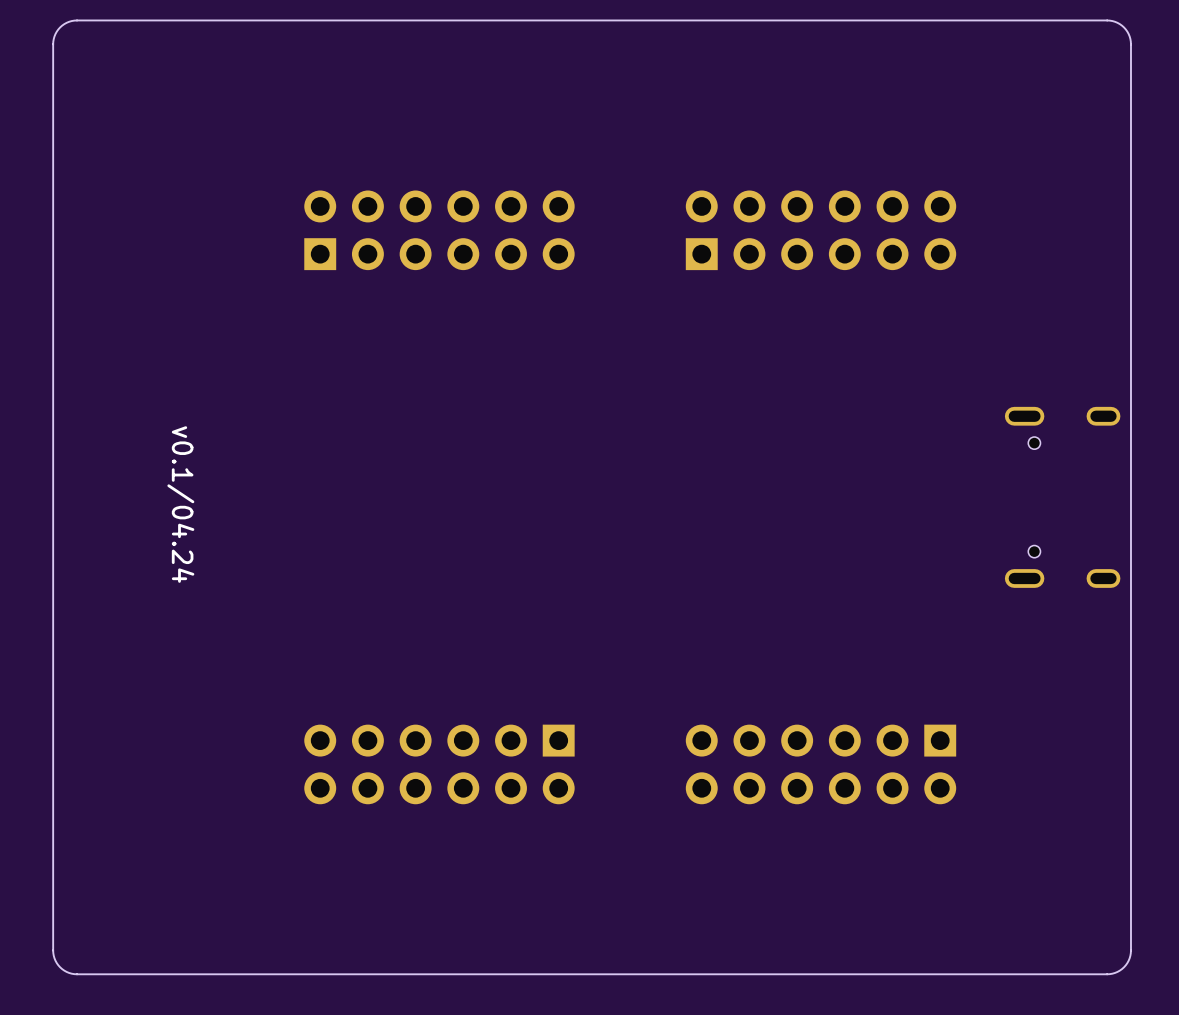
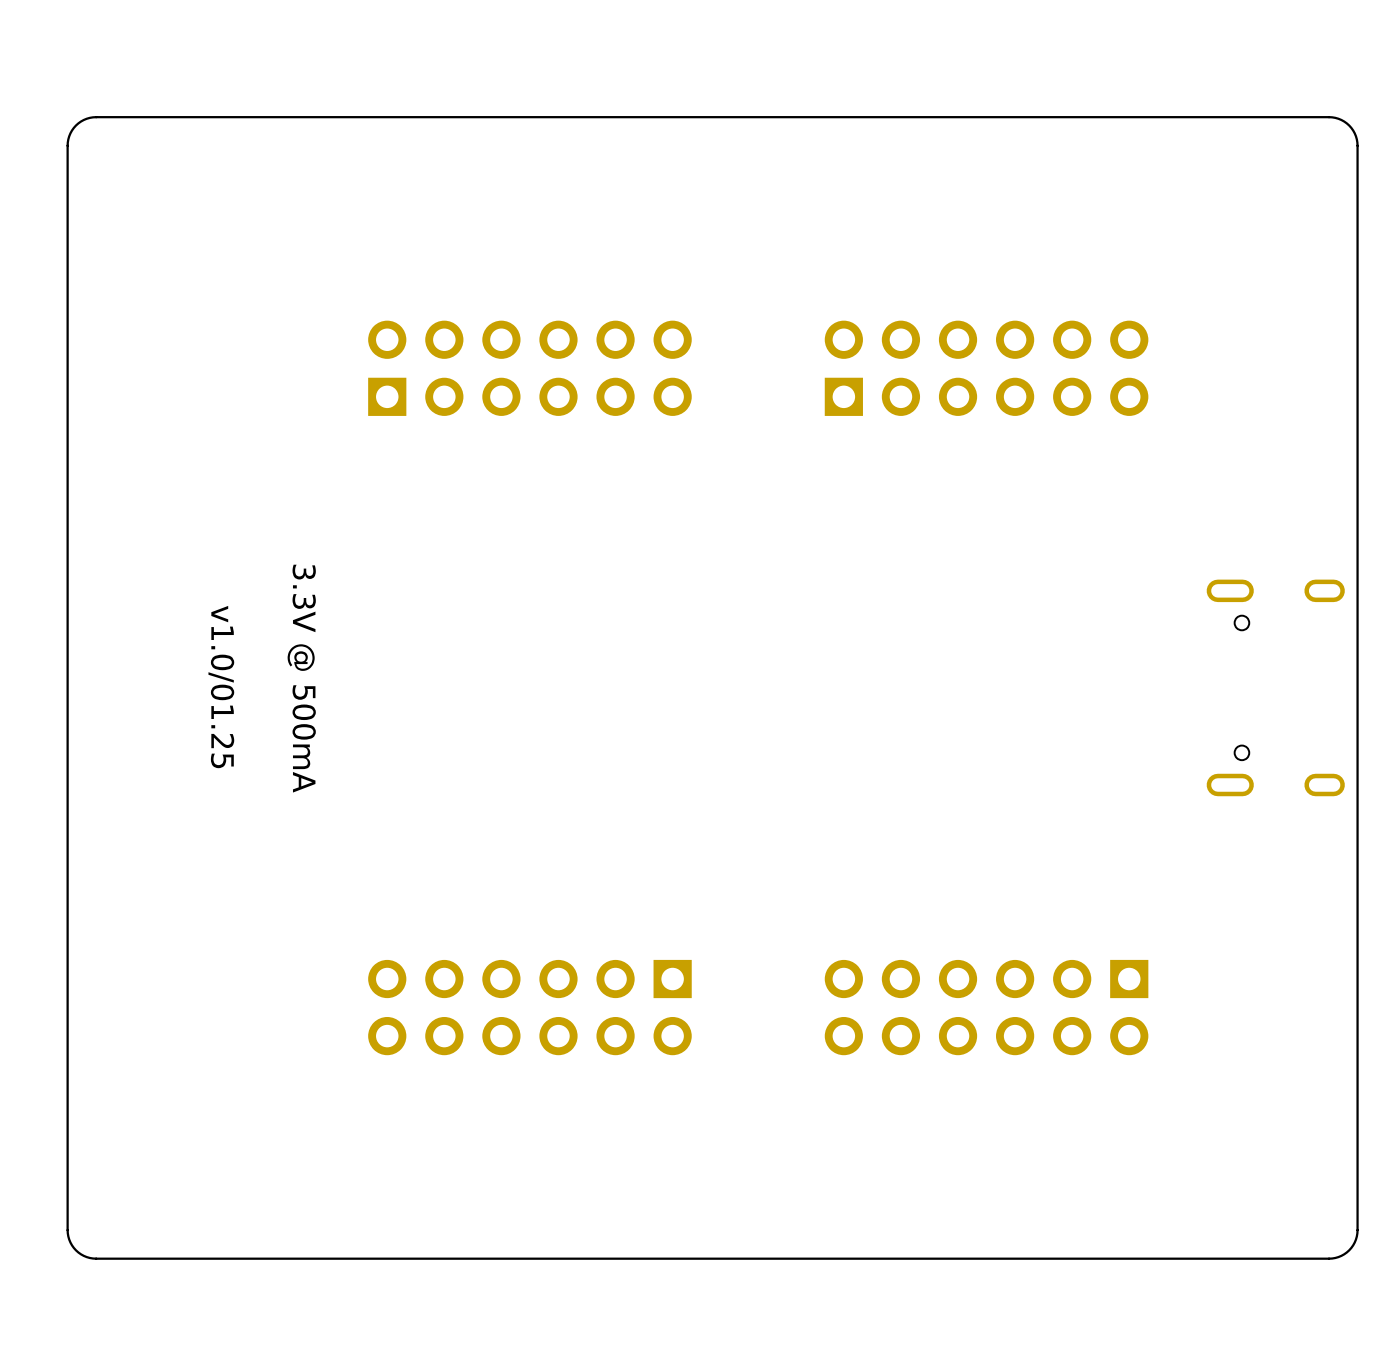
text: none -> 3.3V @ 500mA (301, 678)
text: v0.1/04.24 (180, 504) -> v1.0/01.25 (221, 687)

